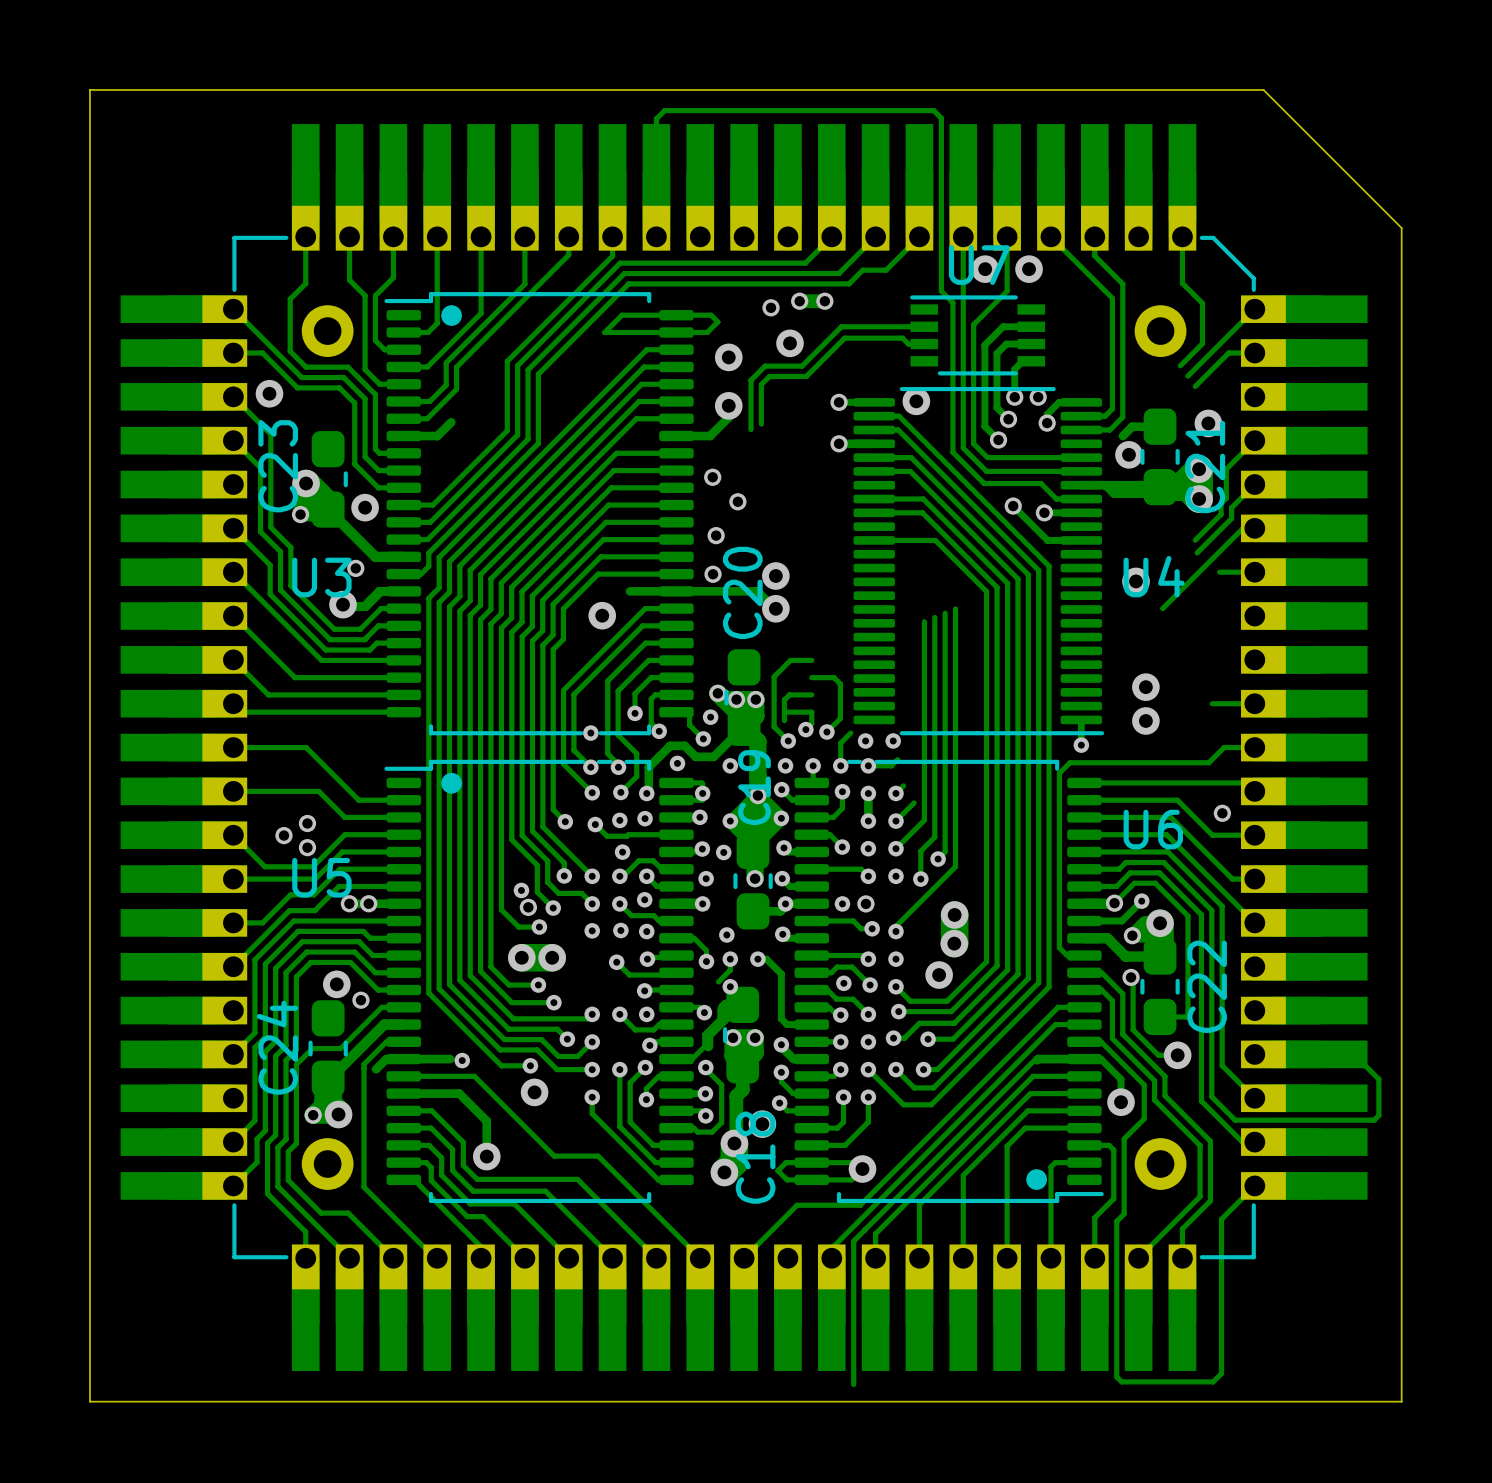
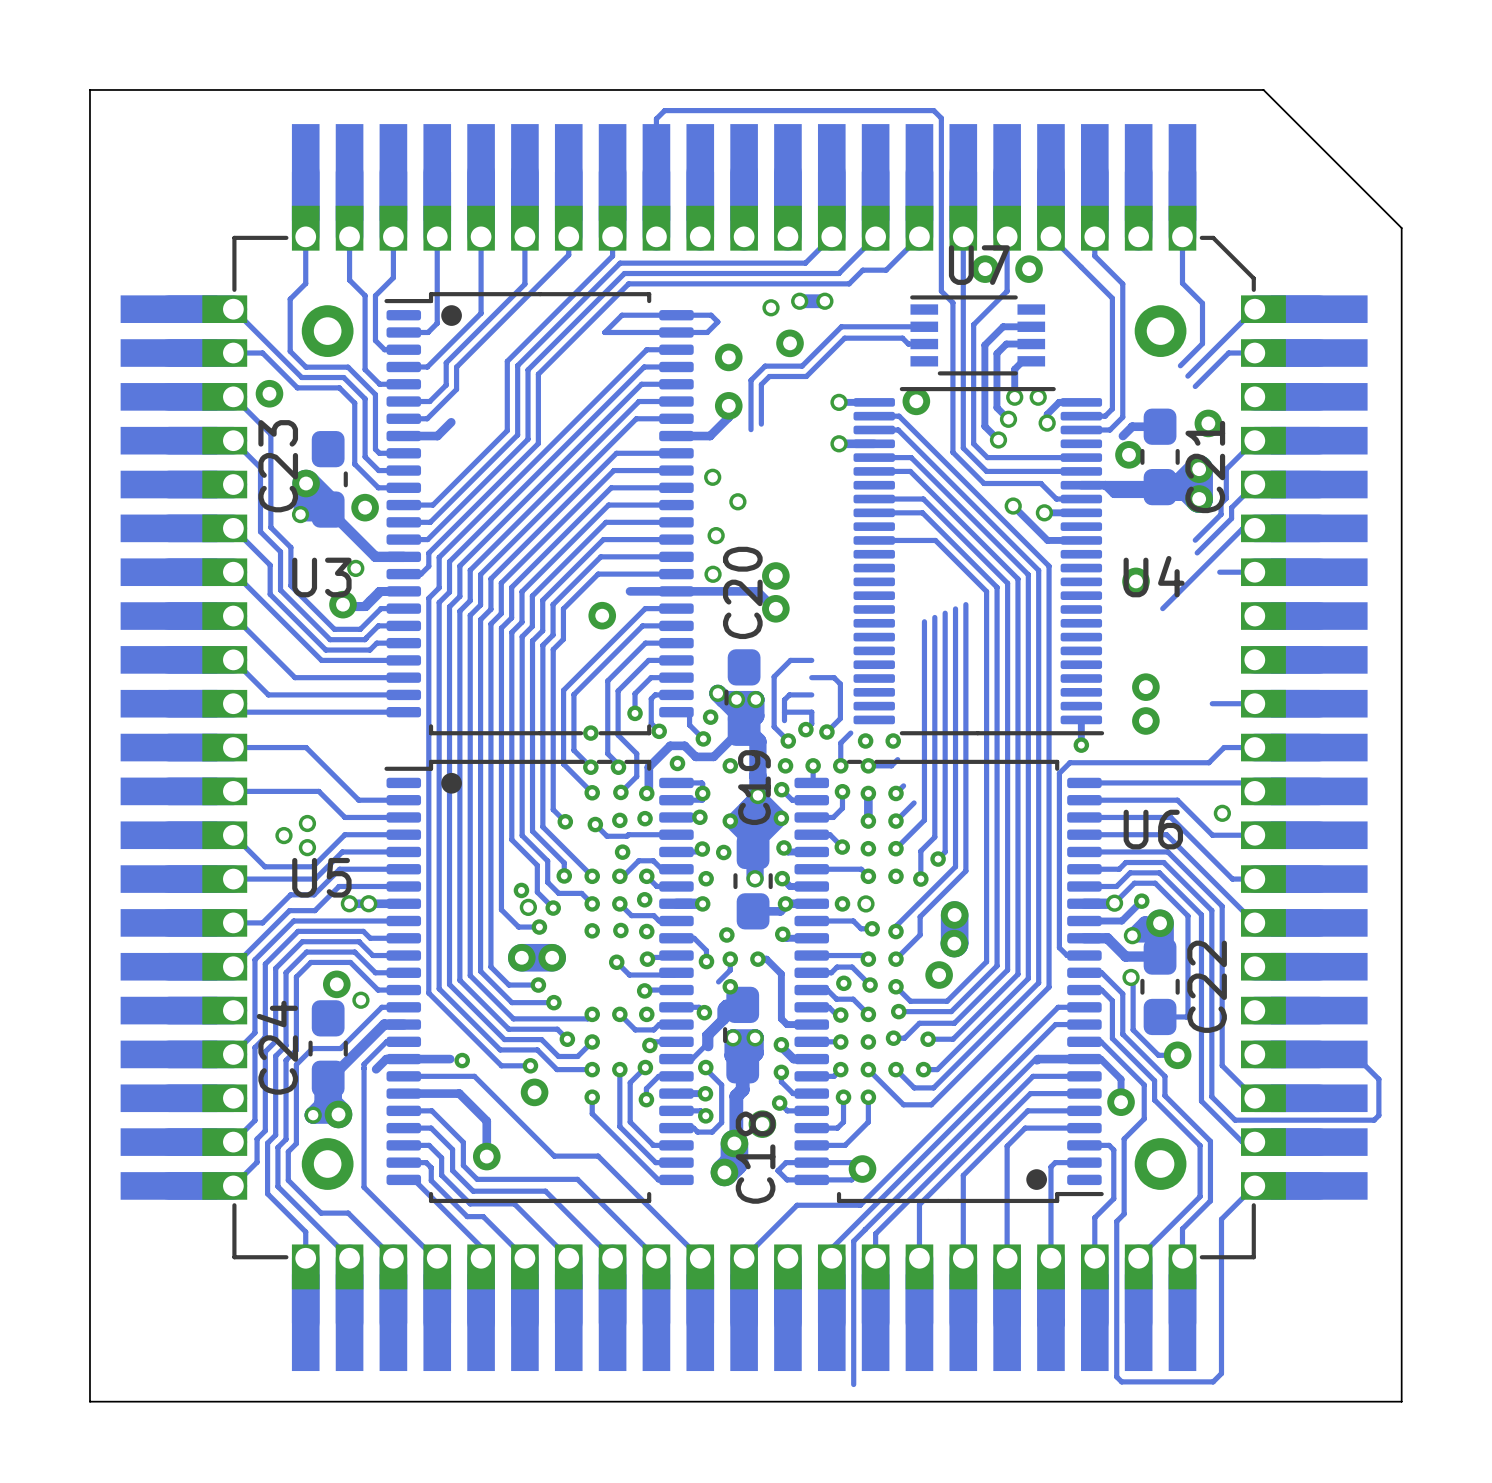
track: none -> (965, 604) (965, 871) (920, 916) (920, 934) (895, 959)

